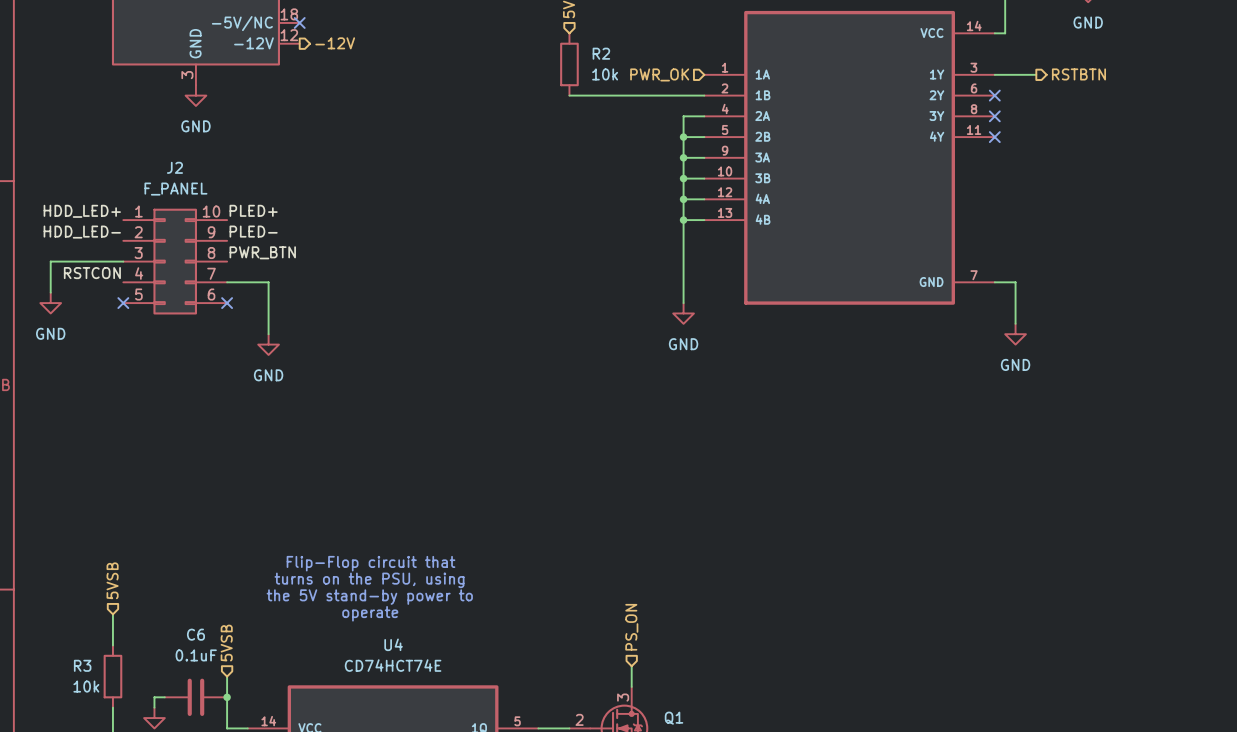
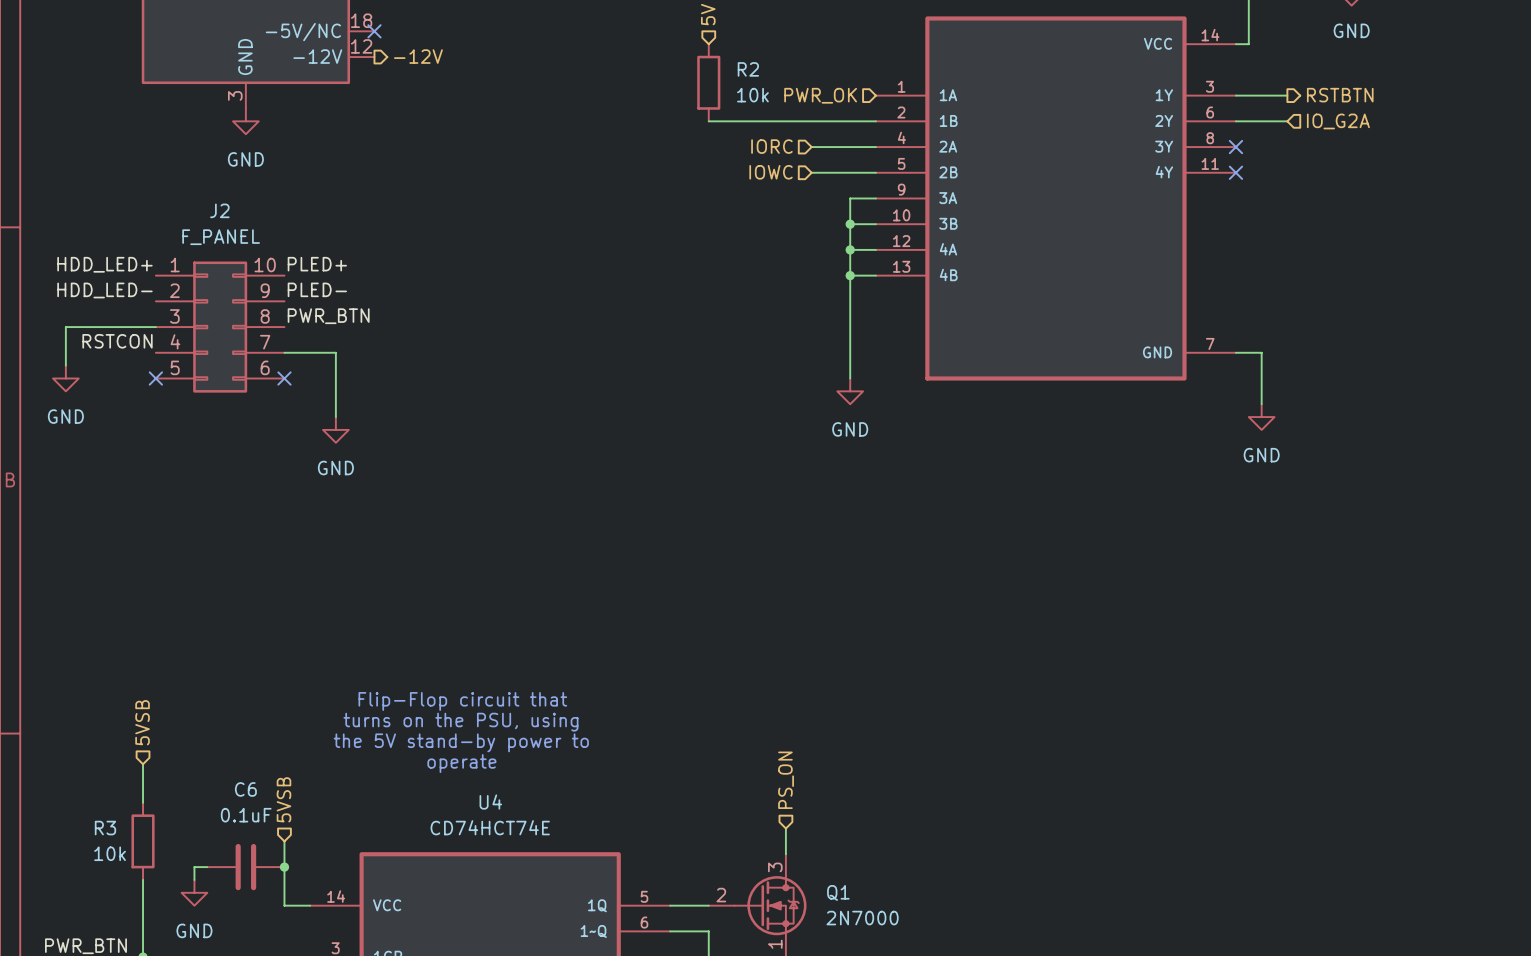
wire: none -> (1235, 121) (1287, 121)
no-connect mark: (994, 95) -> none
hierarchical label: none -> IO_G2A (1338, 121)
hierarchical label: none -> IORC (771, 146)
wire: (683, 116) (683, 157) -> (850, 147) (811, 147)
hierarchical label: none -> IOWC (771, 172)
wire: none -> (811, 172) (850, 172)
junction: (683, 137) -> none
junction: (683, 157) -> none

